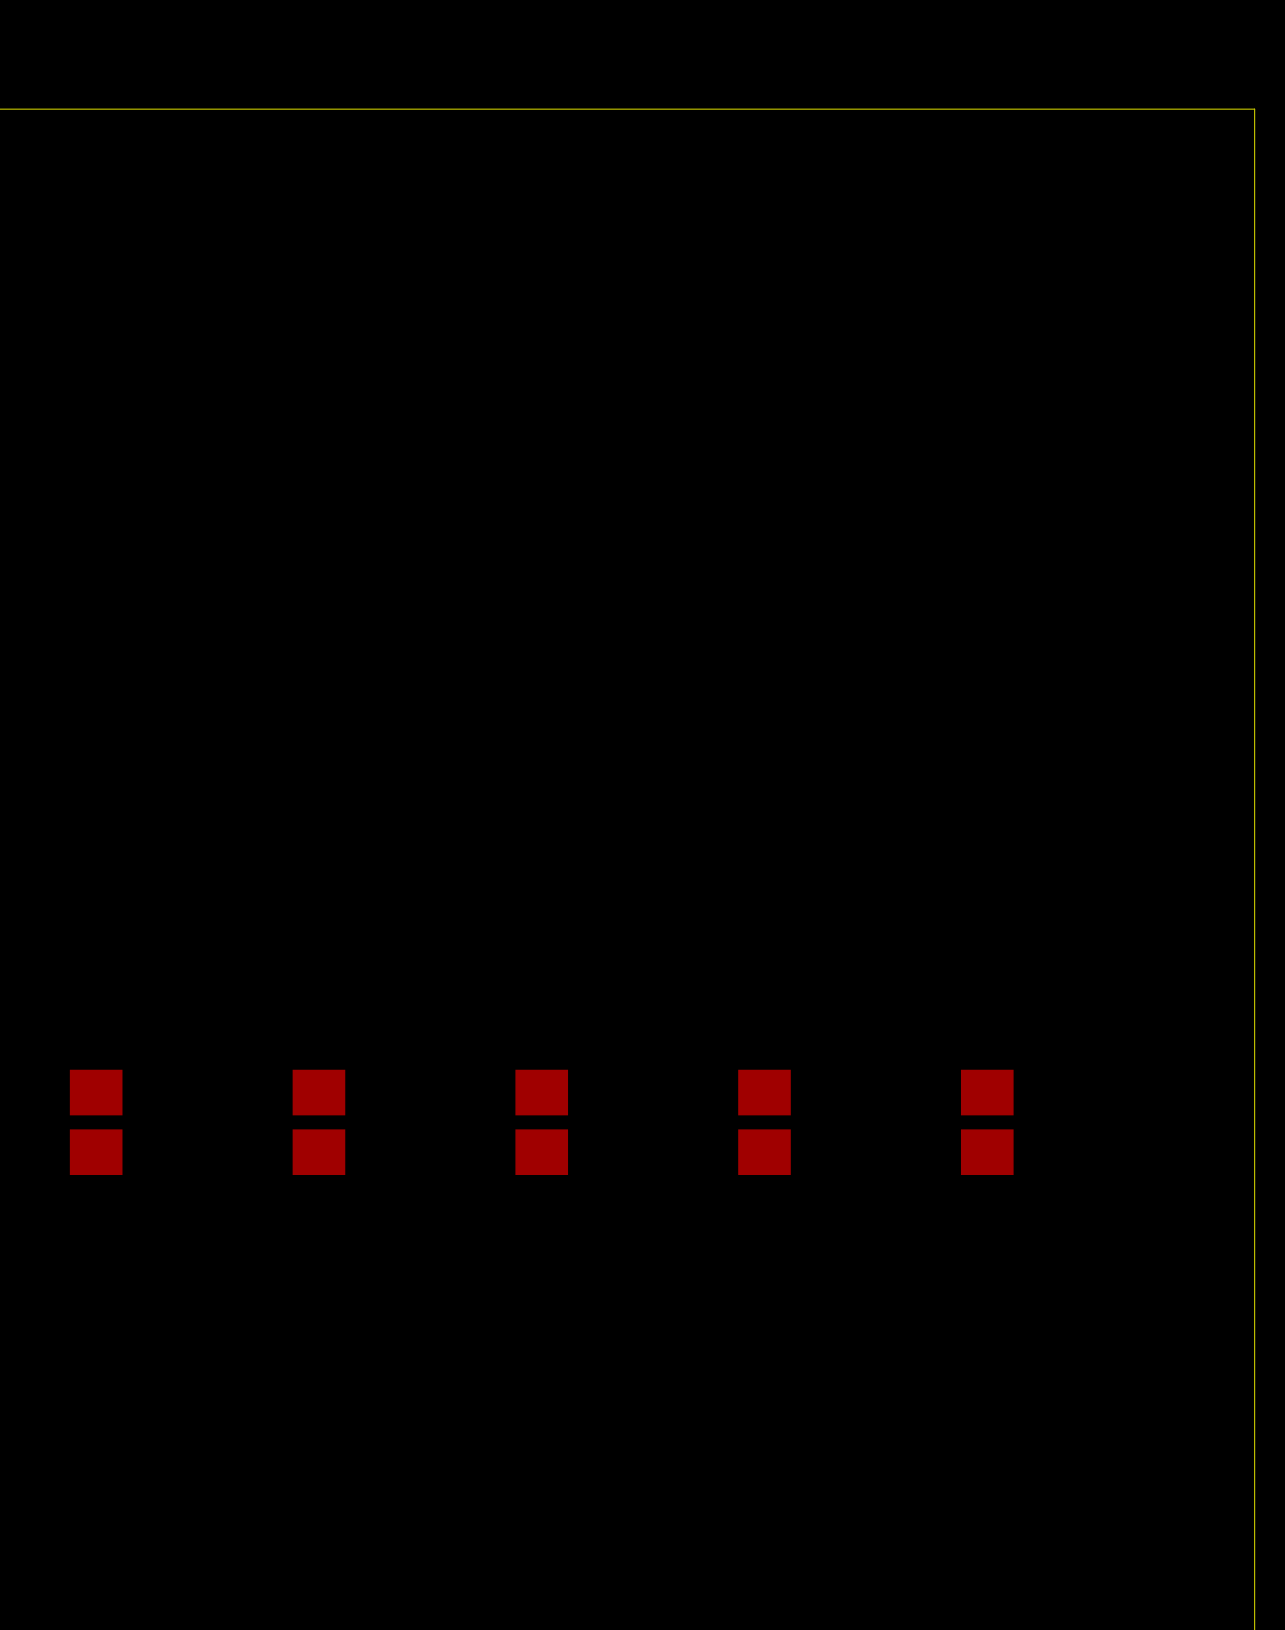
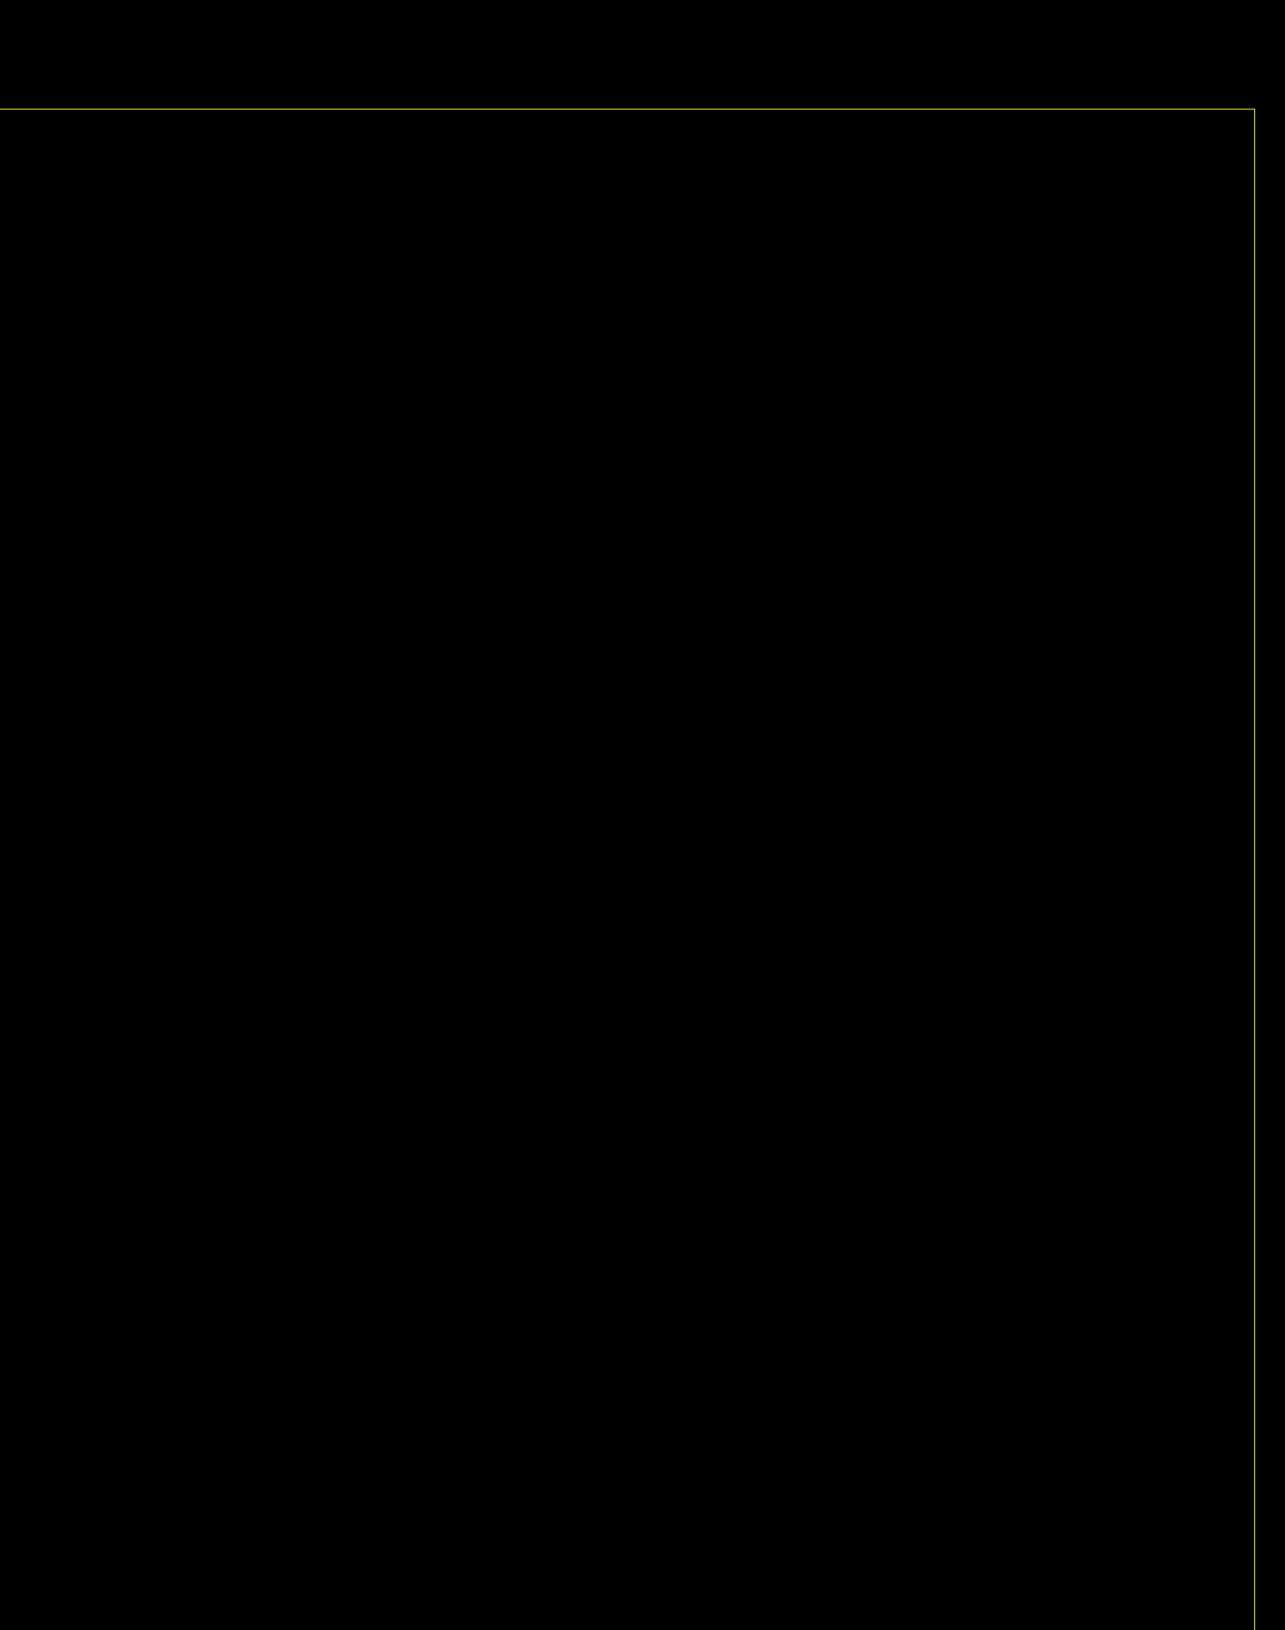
part: (96, 1122) -> none
part: (318, 1122) -> none
part: (541, 1122) -> none
part: (764, 1122) -> none
part: (987, 1122) -> none

